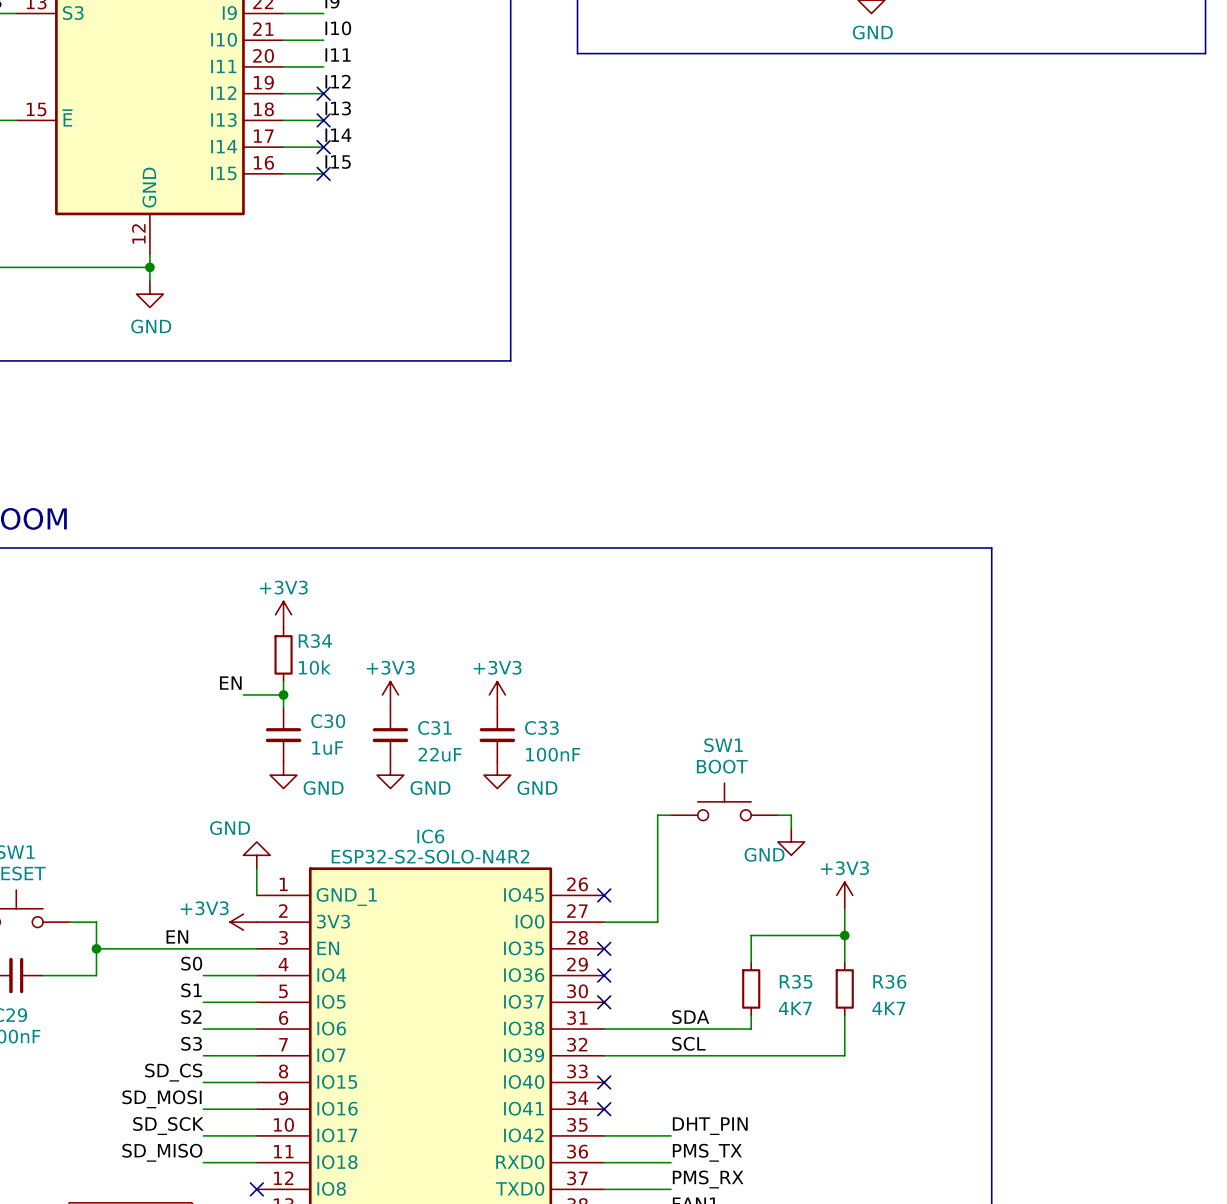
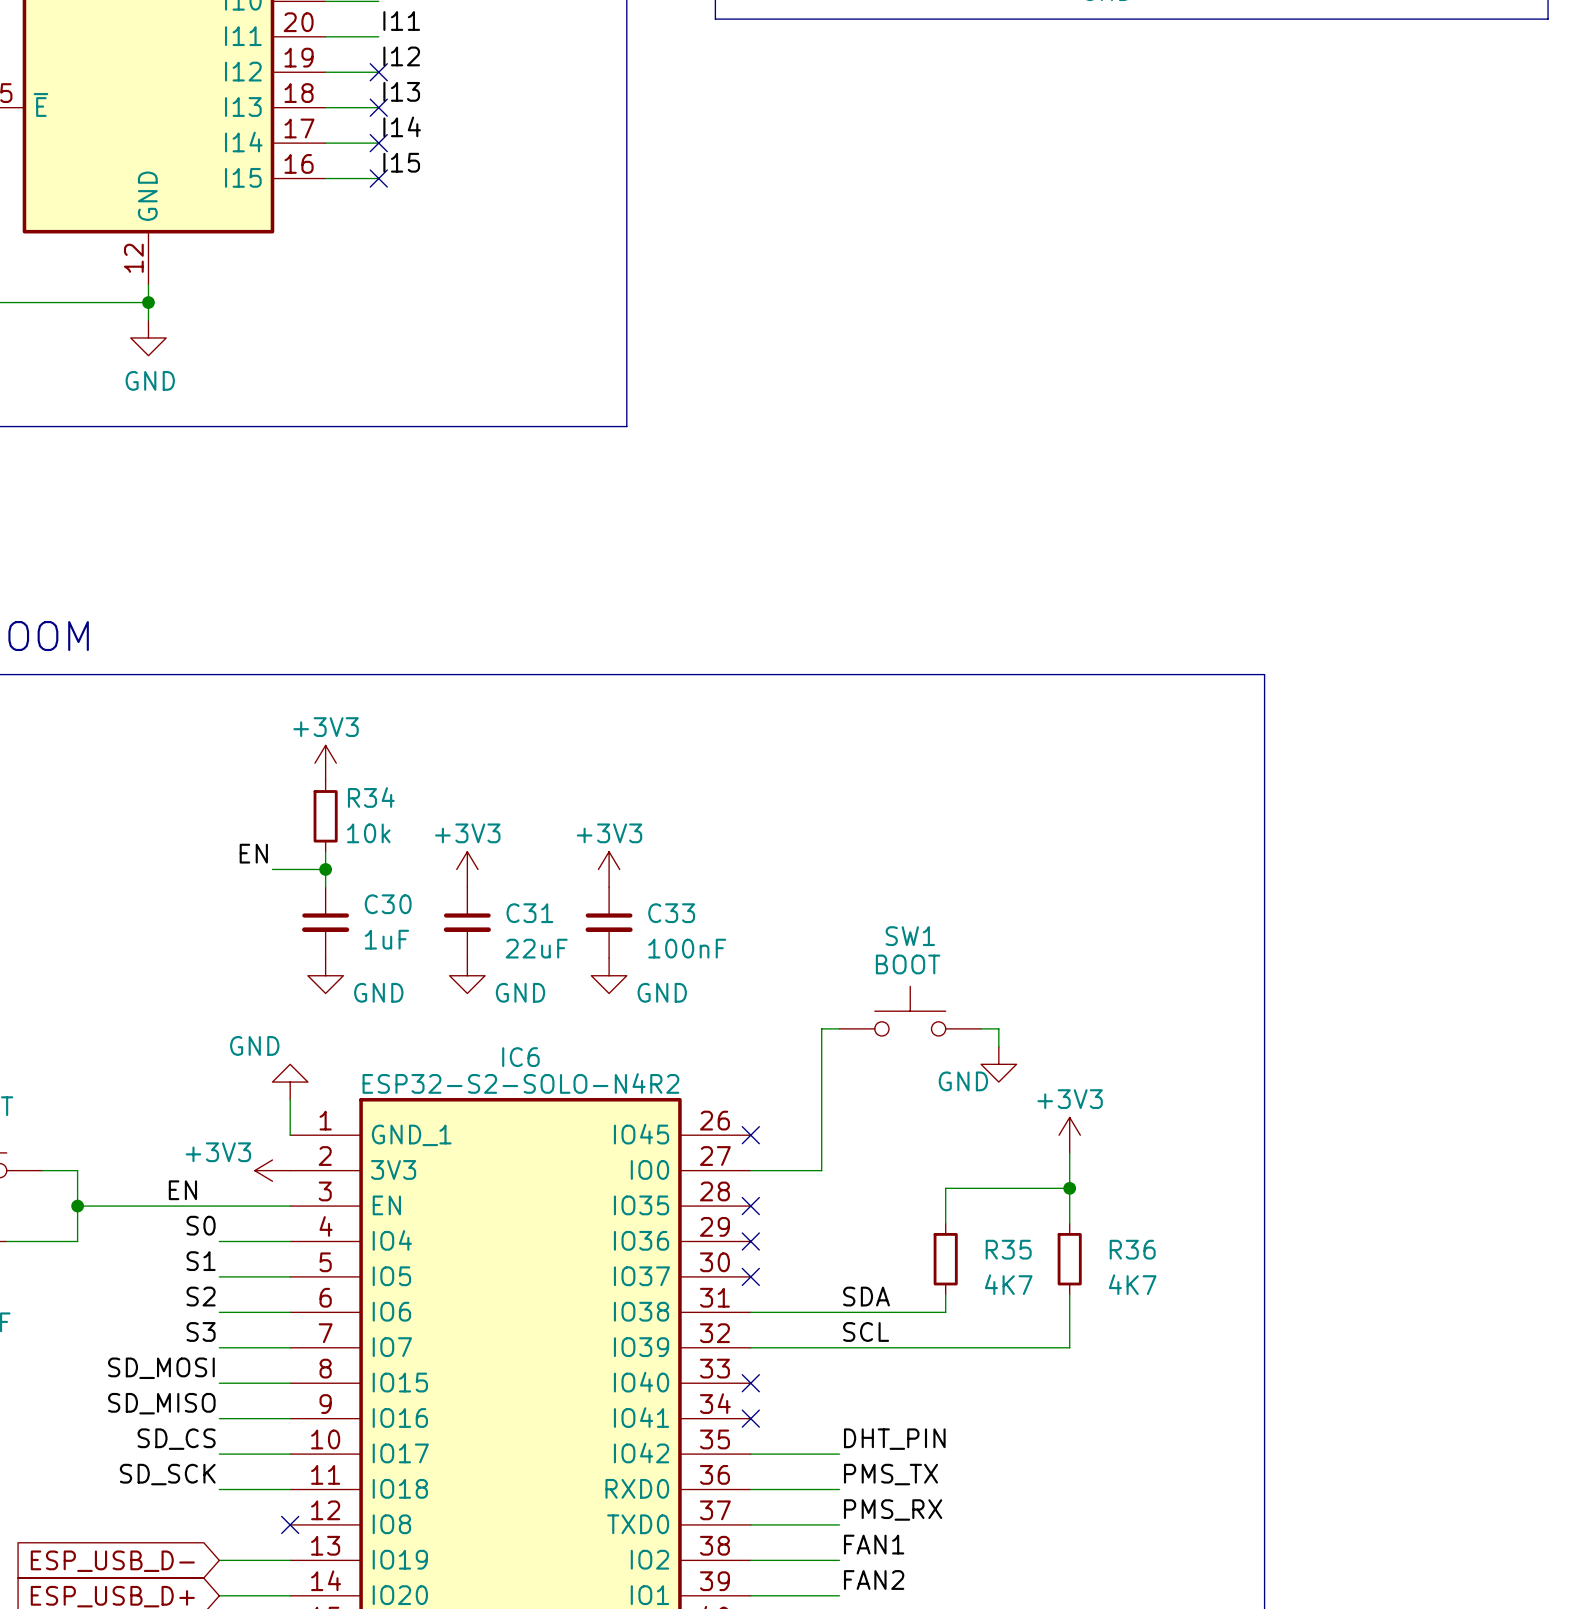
label: SD_CS (173, 1072) -> SD_MOSI (161, 1368)
label: SD_MOSI (161, 1099) -> SD_MISO (161, 1403)
label: SD_SCK (168, 1126) -> SD_CS (176, 1439)
label: SD_MISO (162, 1152) -> SD_SCK (167, 1474)

